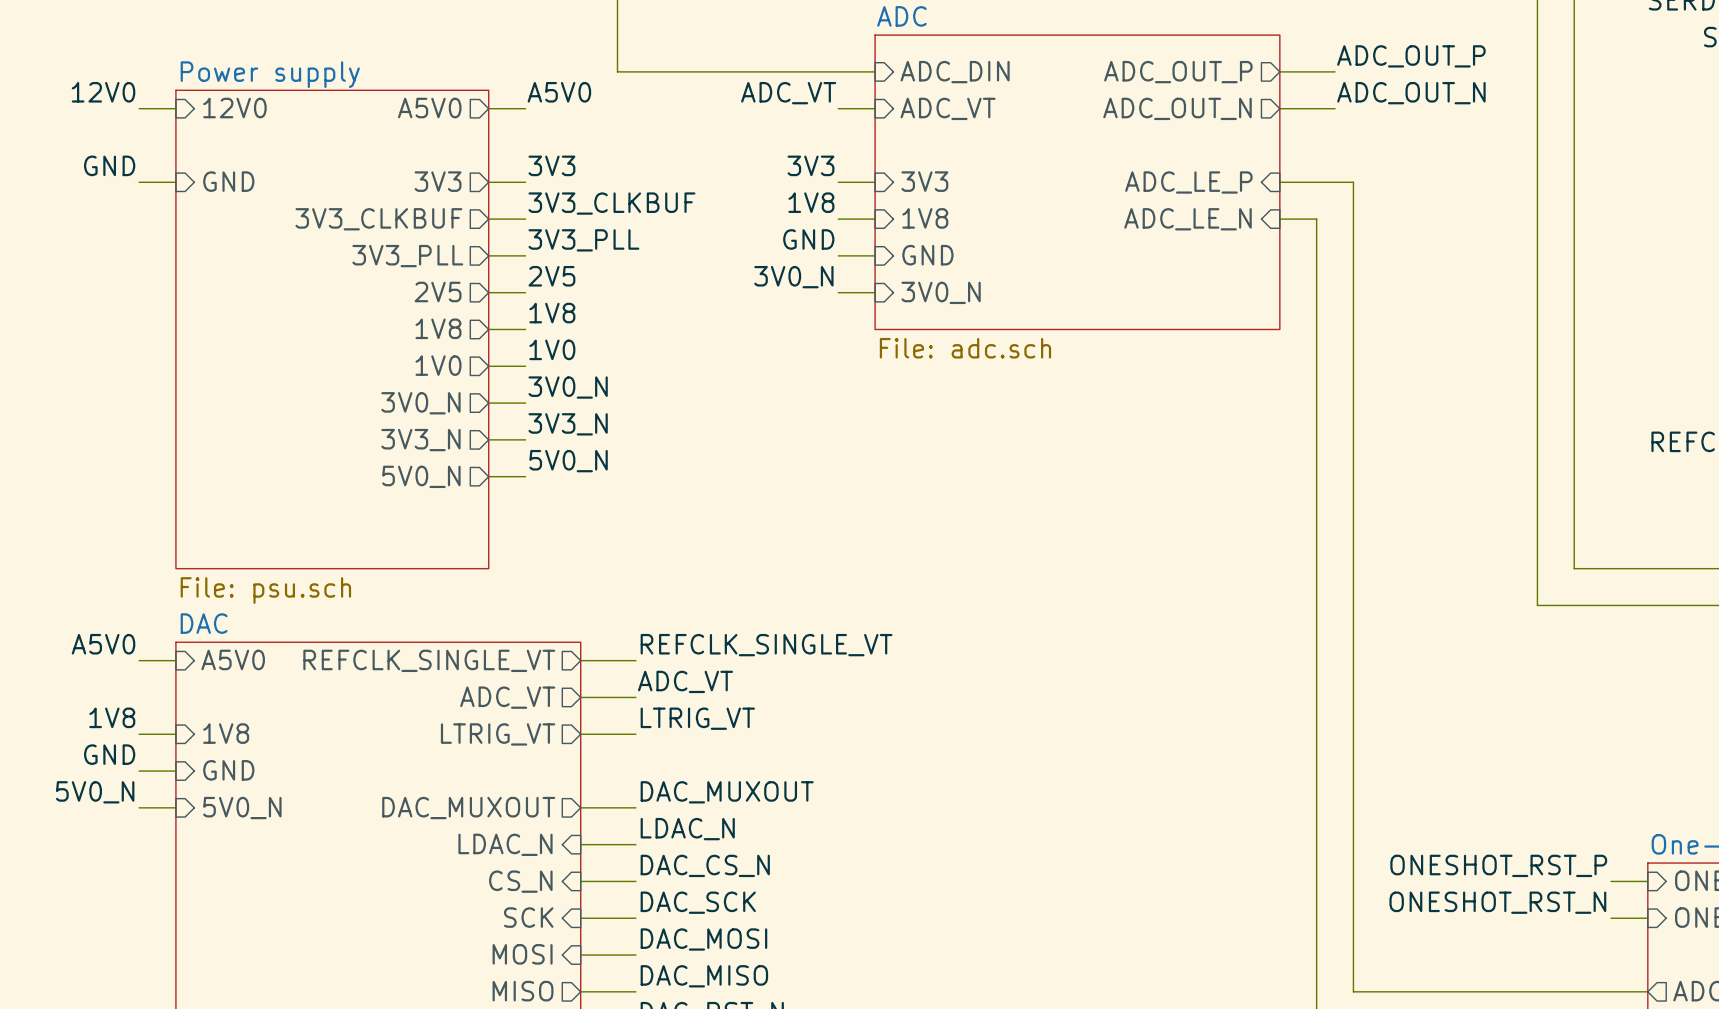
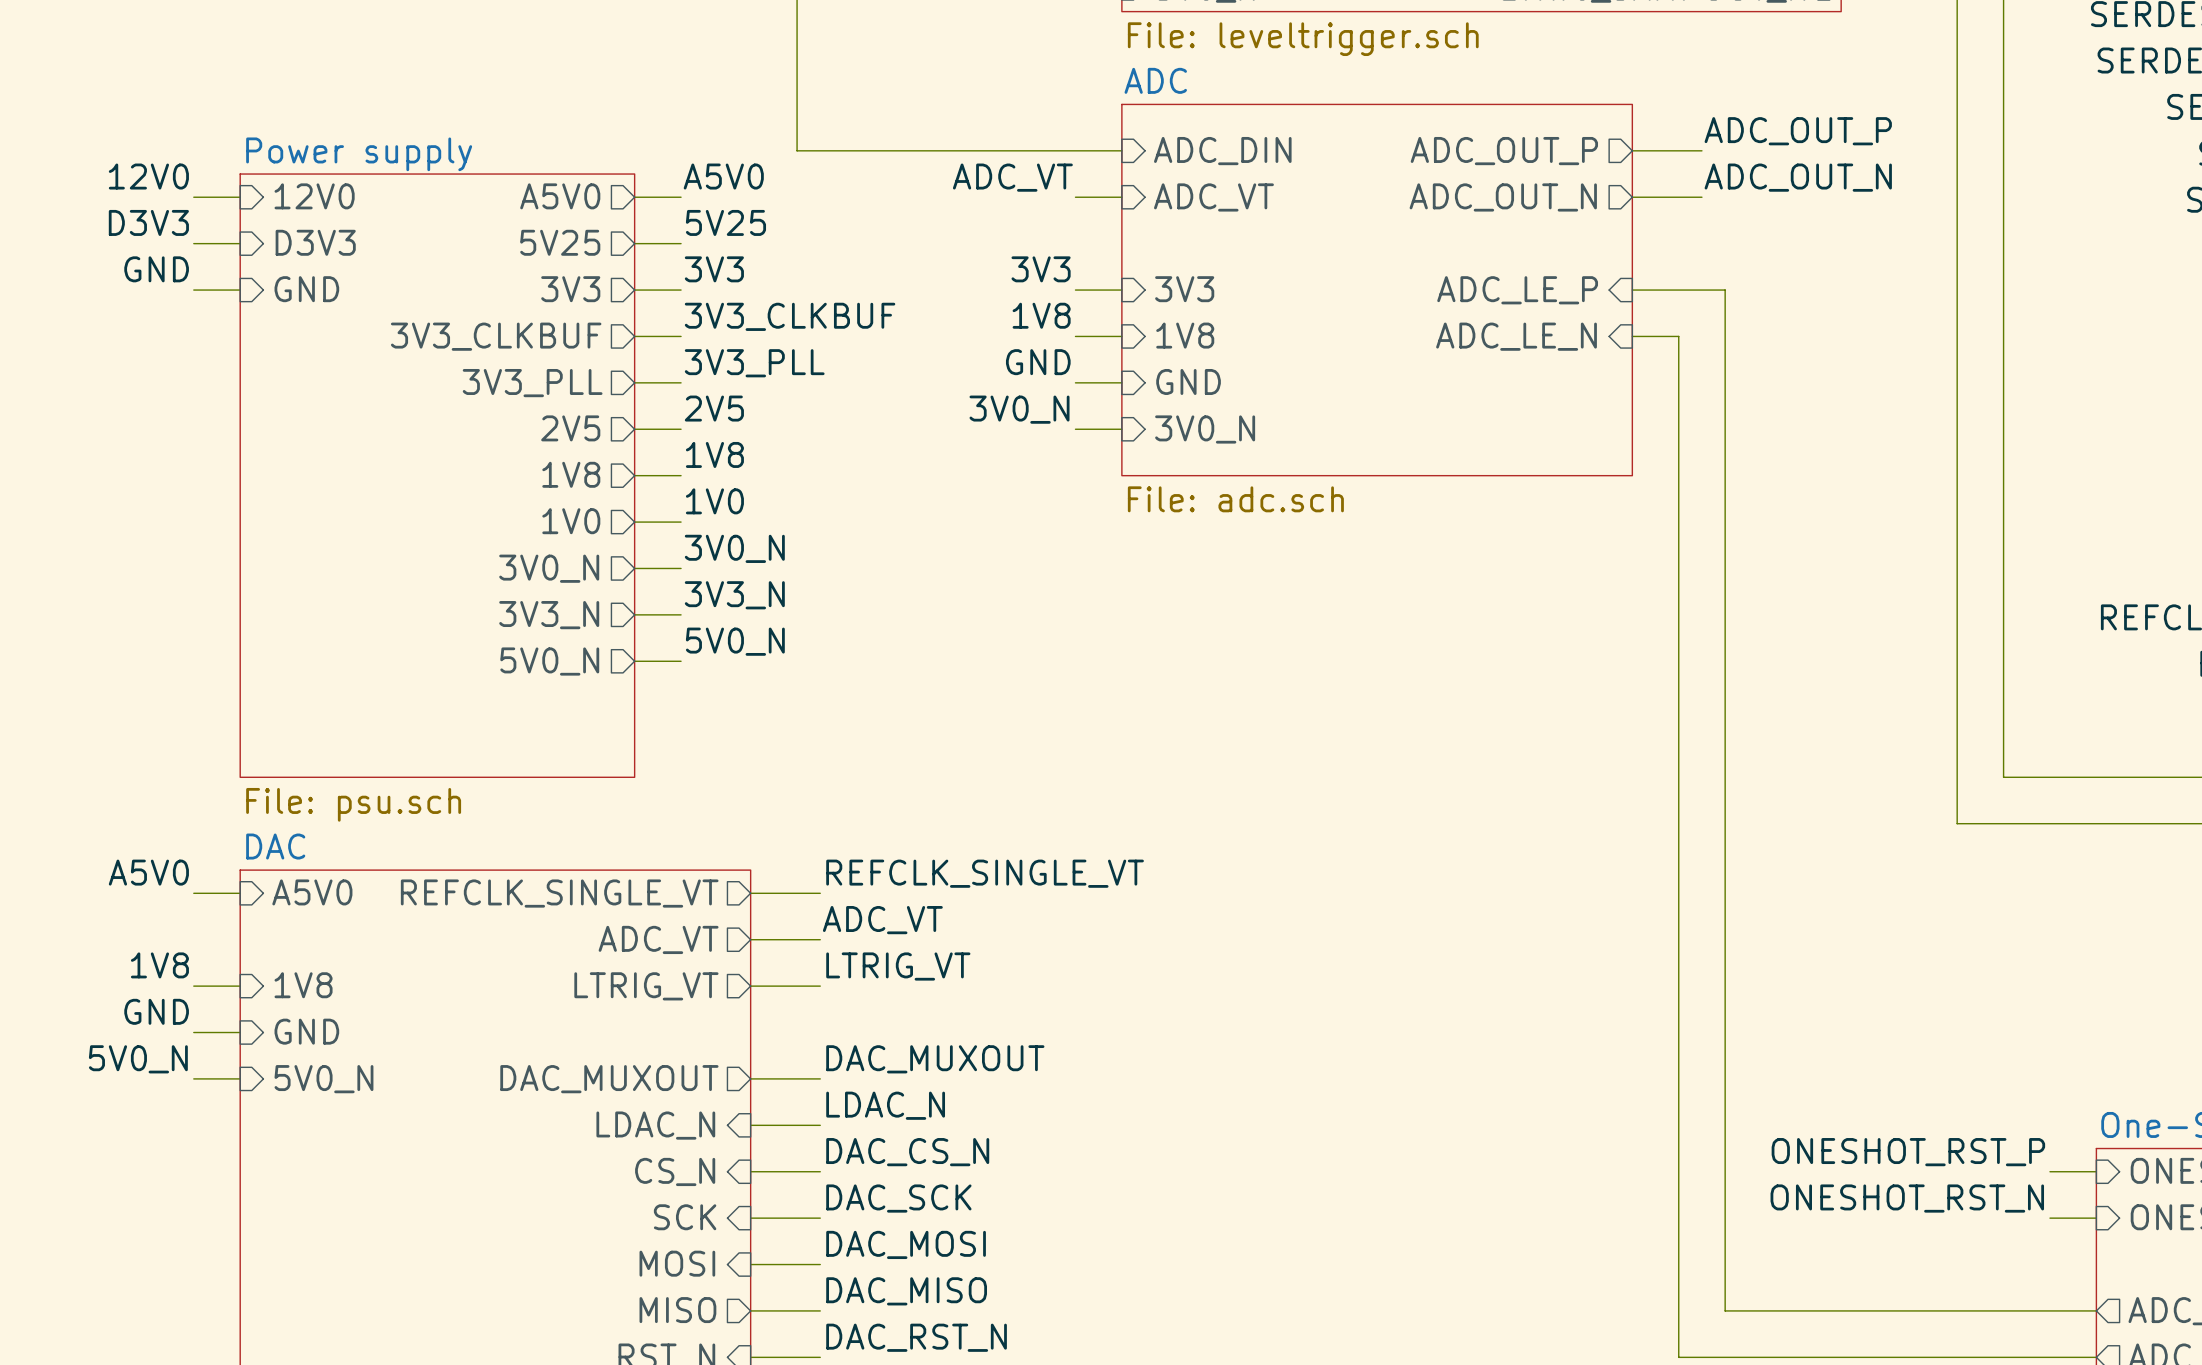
label: none -> D3V3 (148, 222)
label: none -> 5V25 (725, 222)
sheet pin: none -> D3V3 (315, 242)
sheet pin: none -> 5V25 (560, 242)
wire: none -> (193, 243) (240, 243)
wire: none -> (634, 243) (681, 243)

